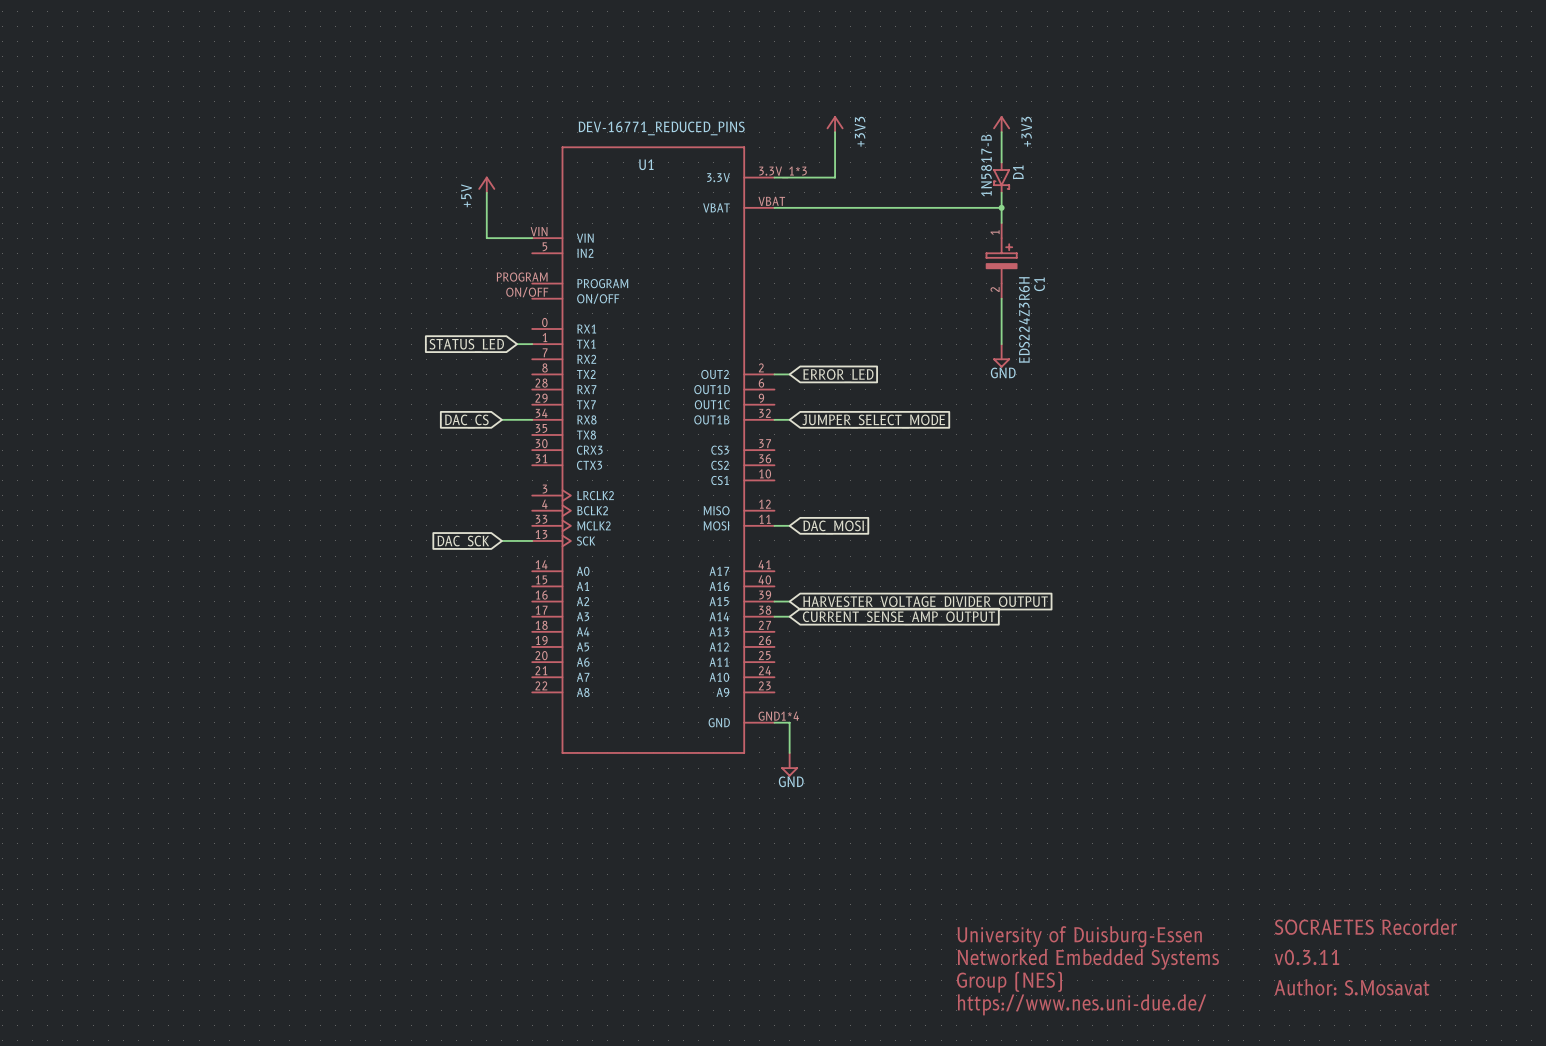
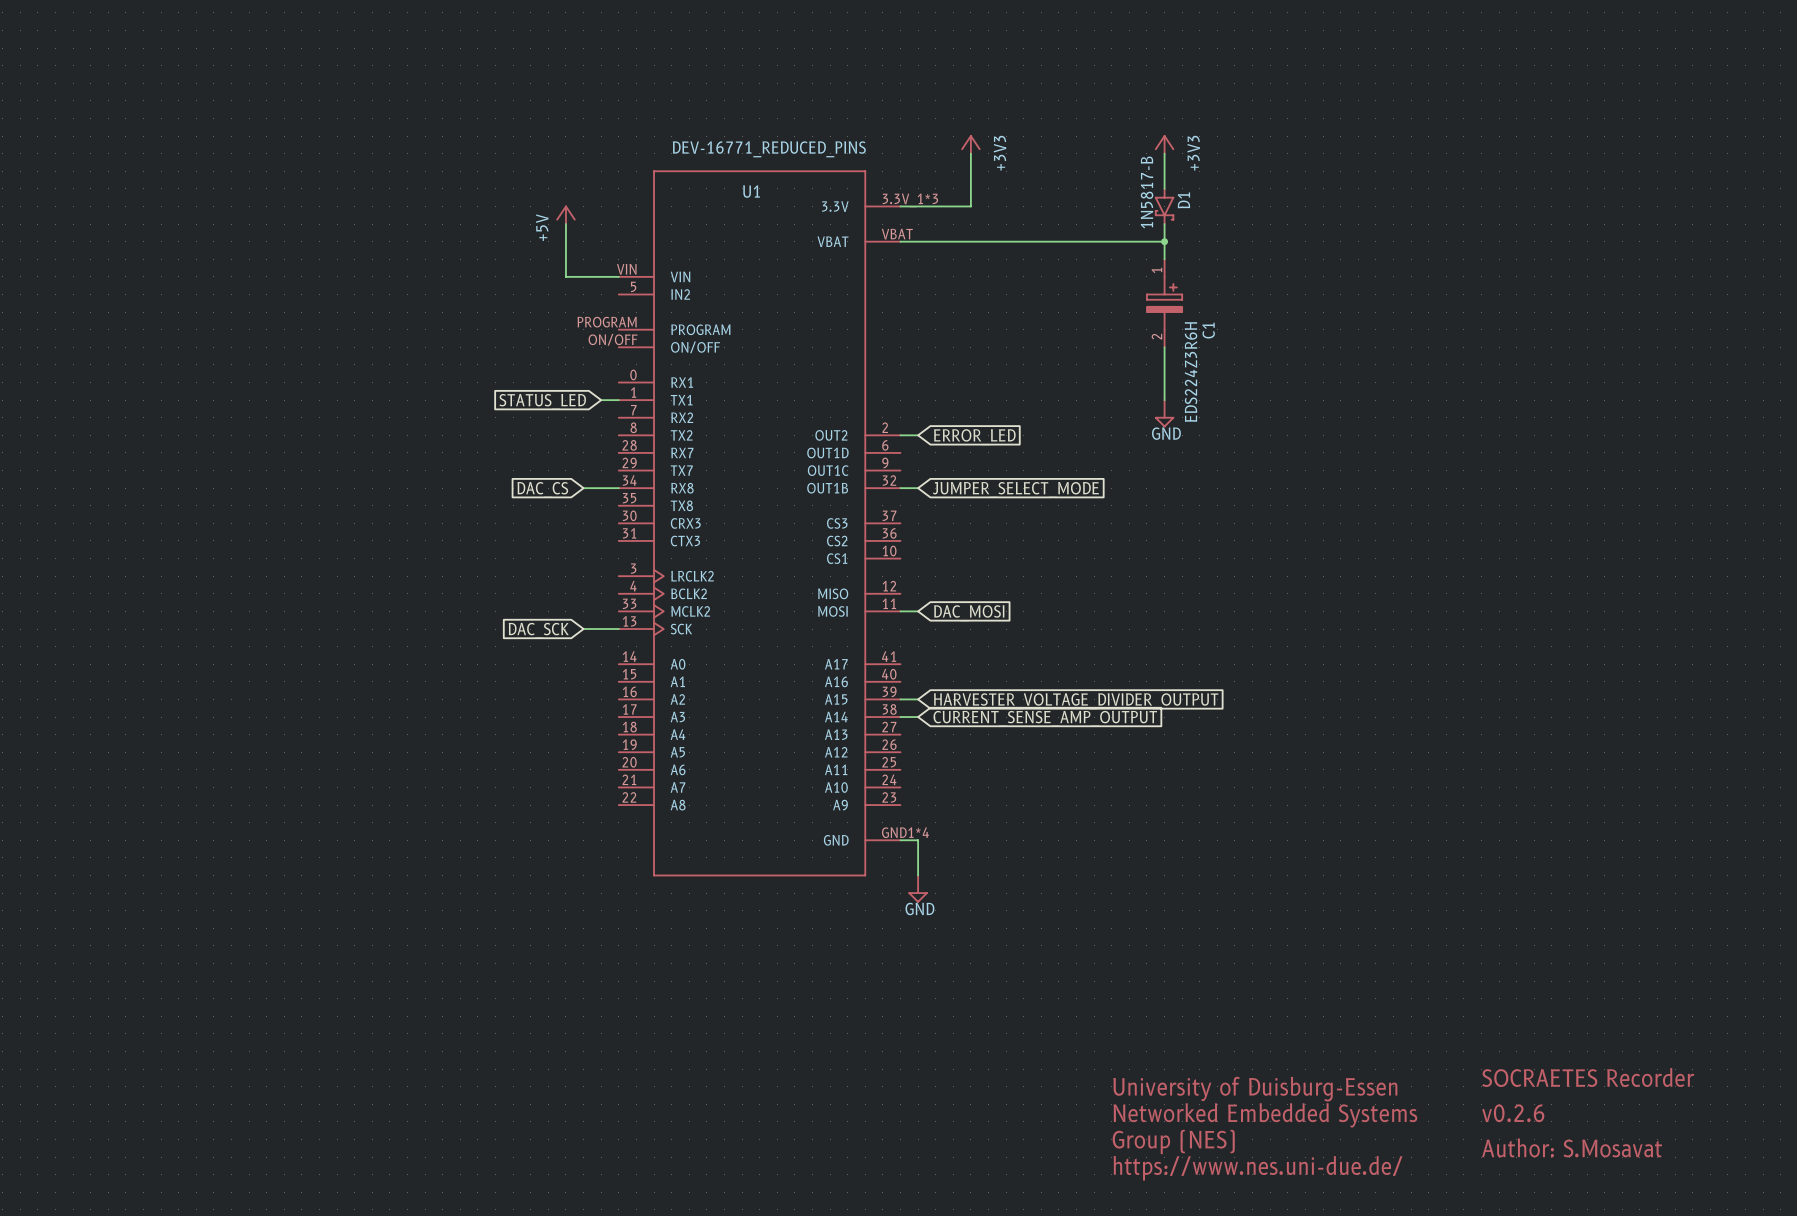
text: v0.3.11 (1306, 957) -> v0.2.6 (1513, 1113)

